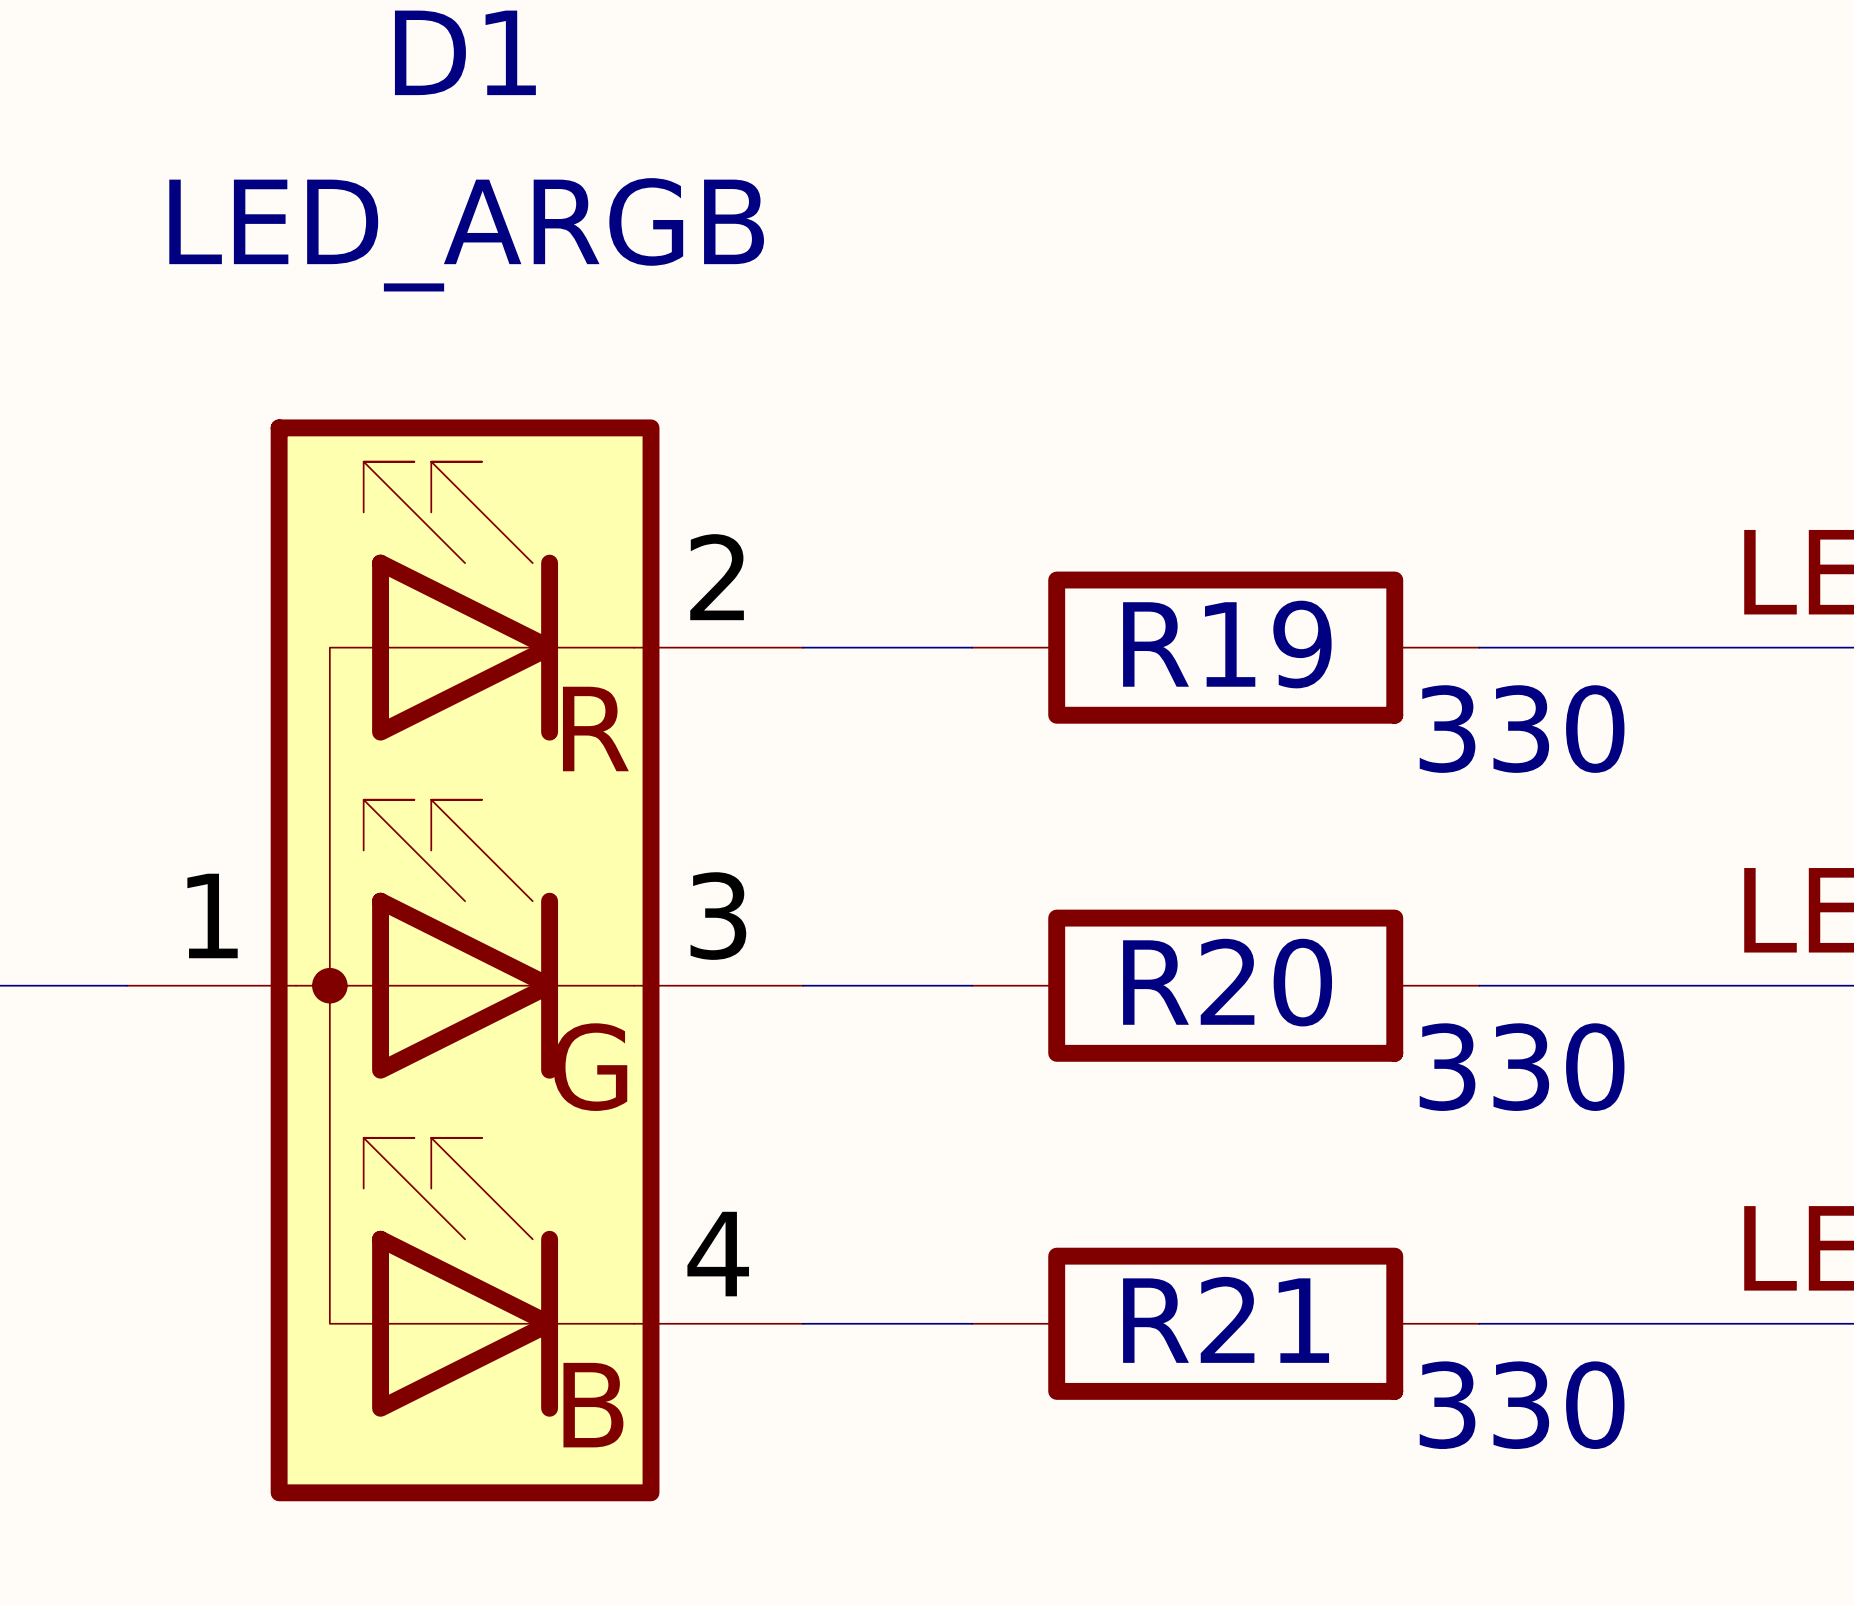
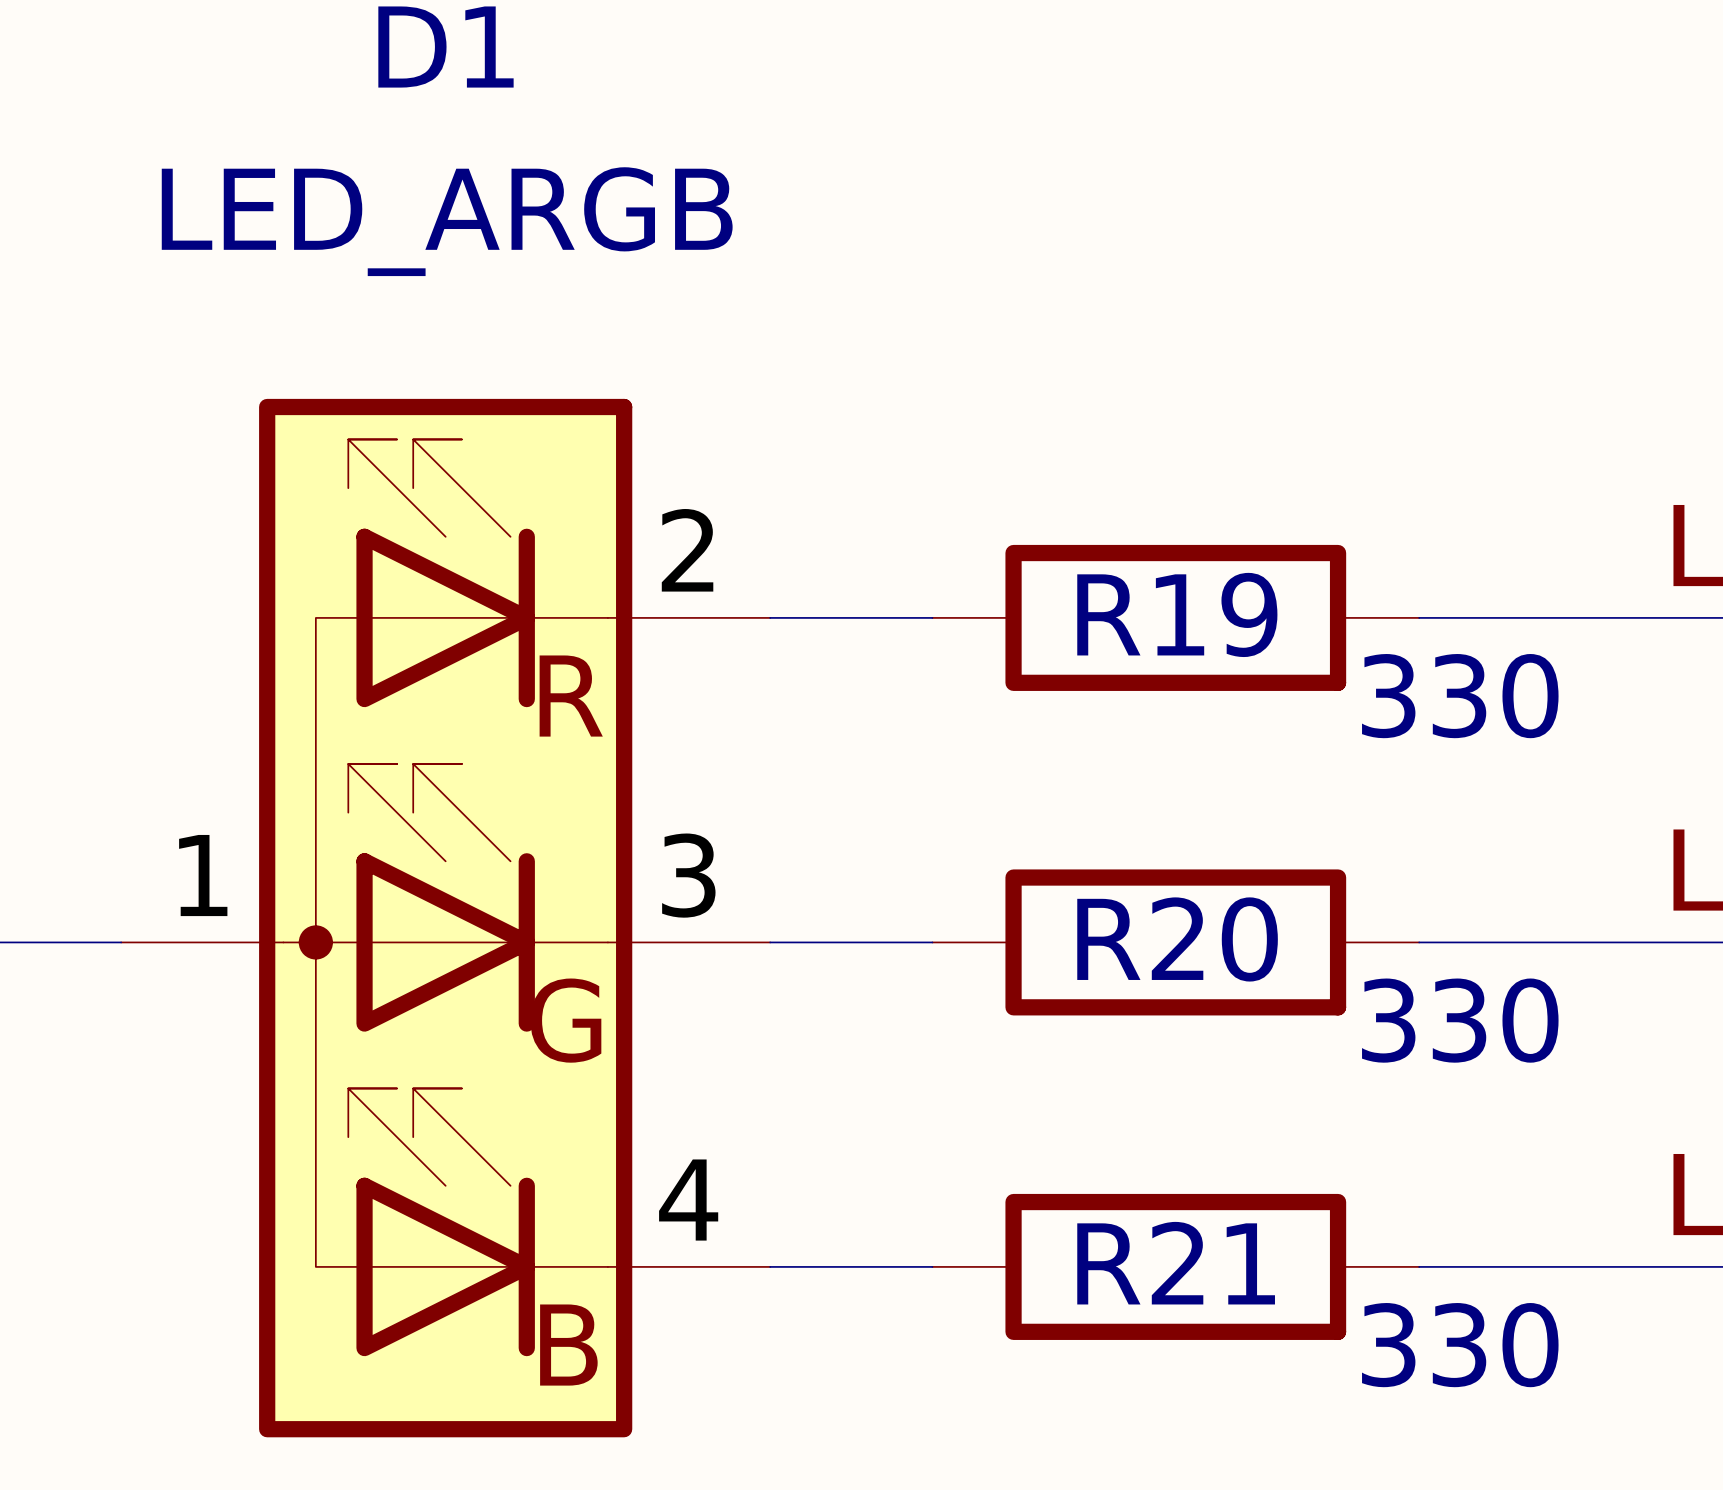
D1 symbol: [127, 419, 804, 1502] -> [121, 398, 771, 1438]

